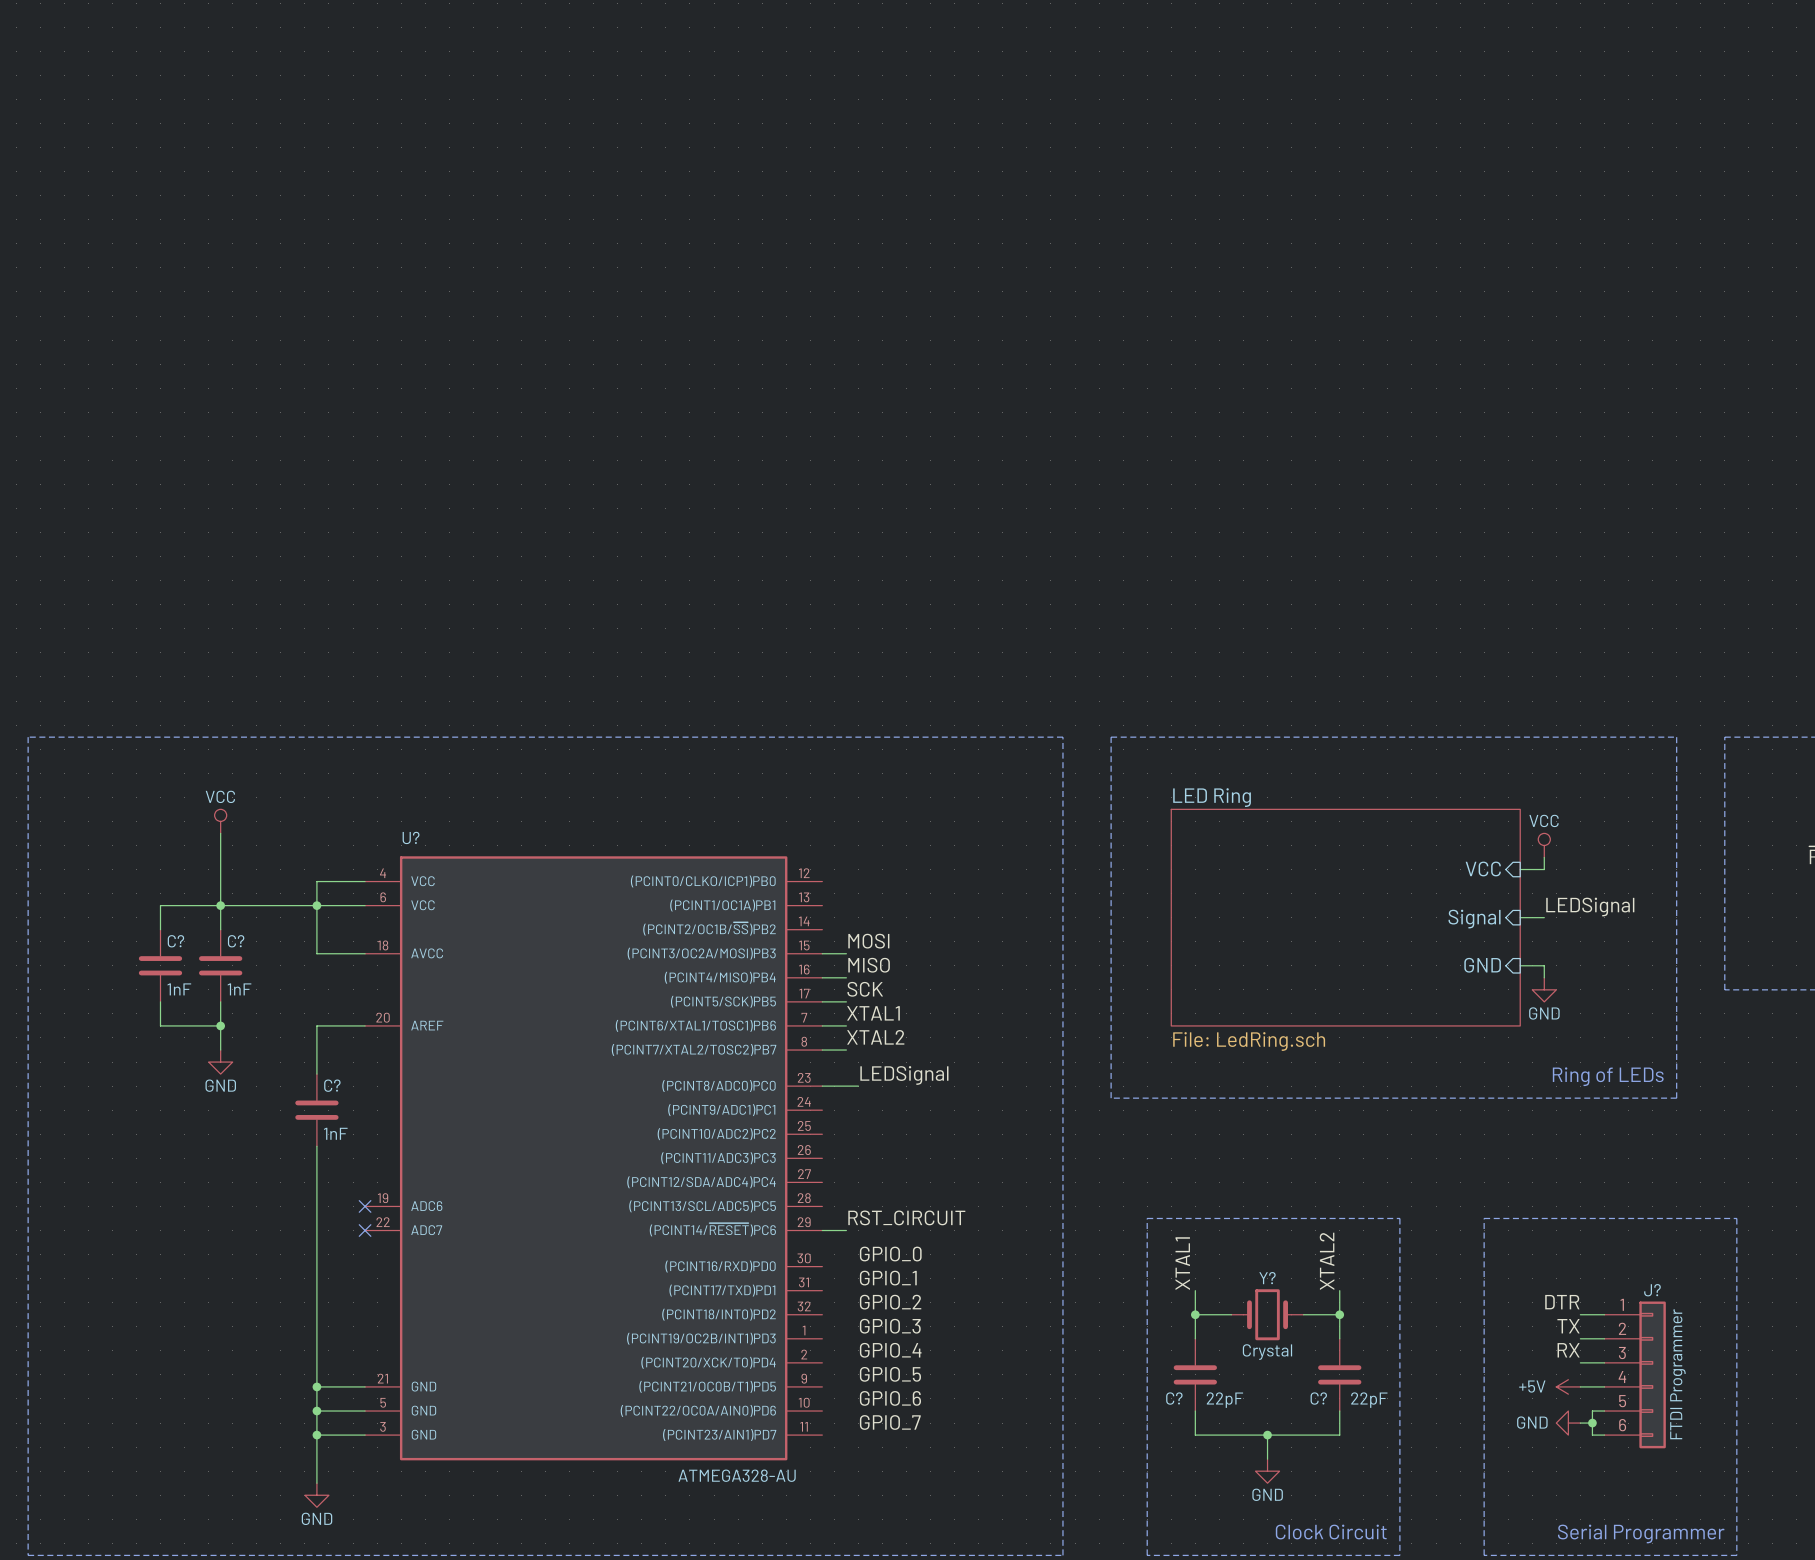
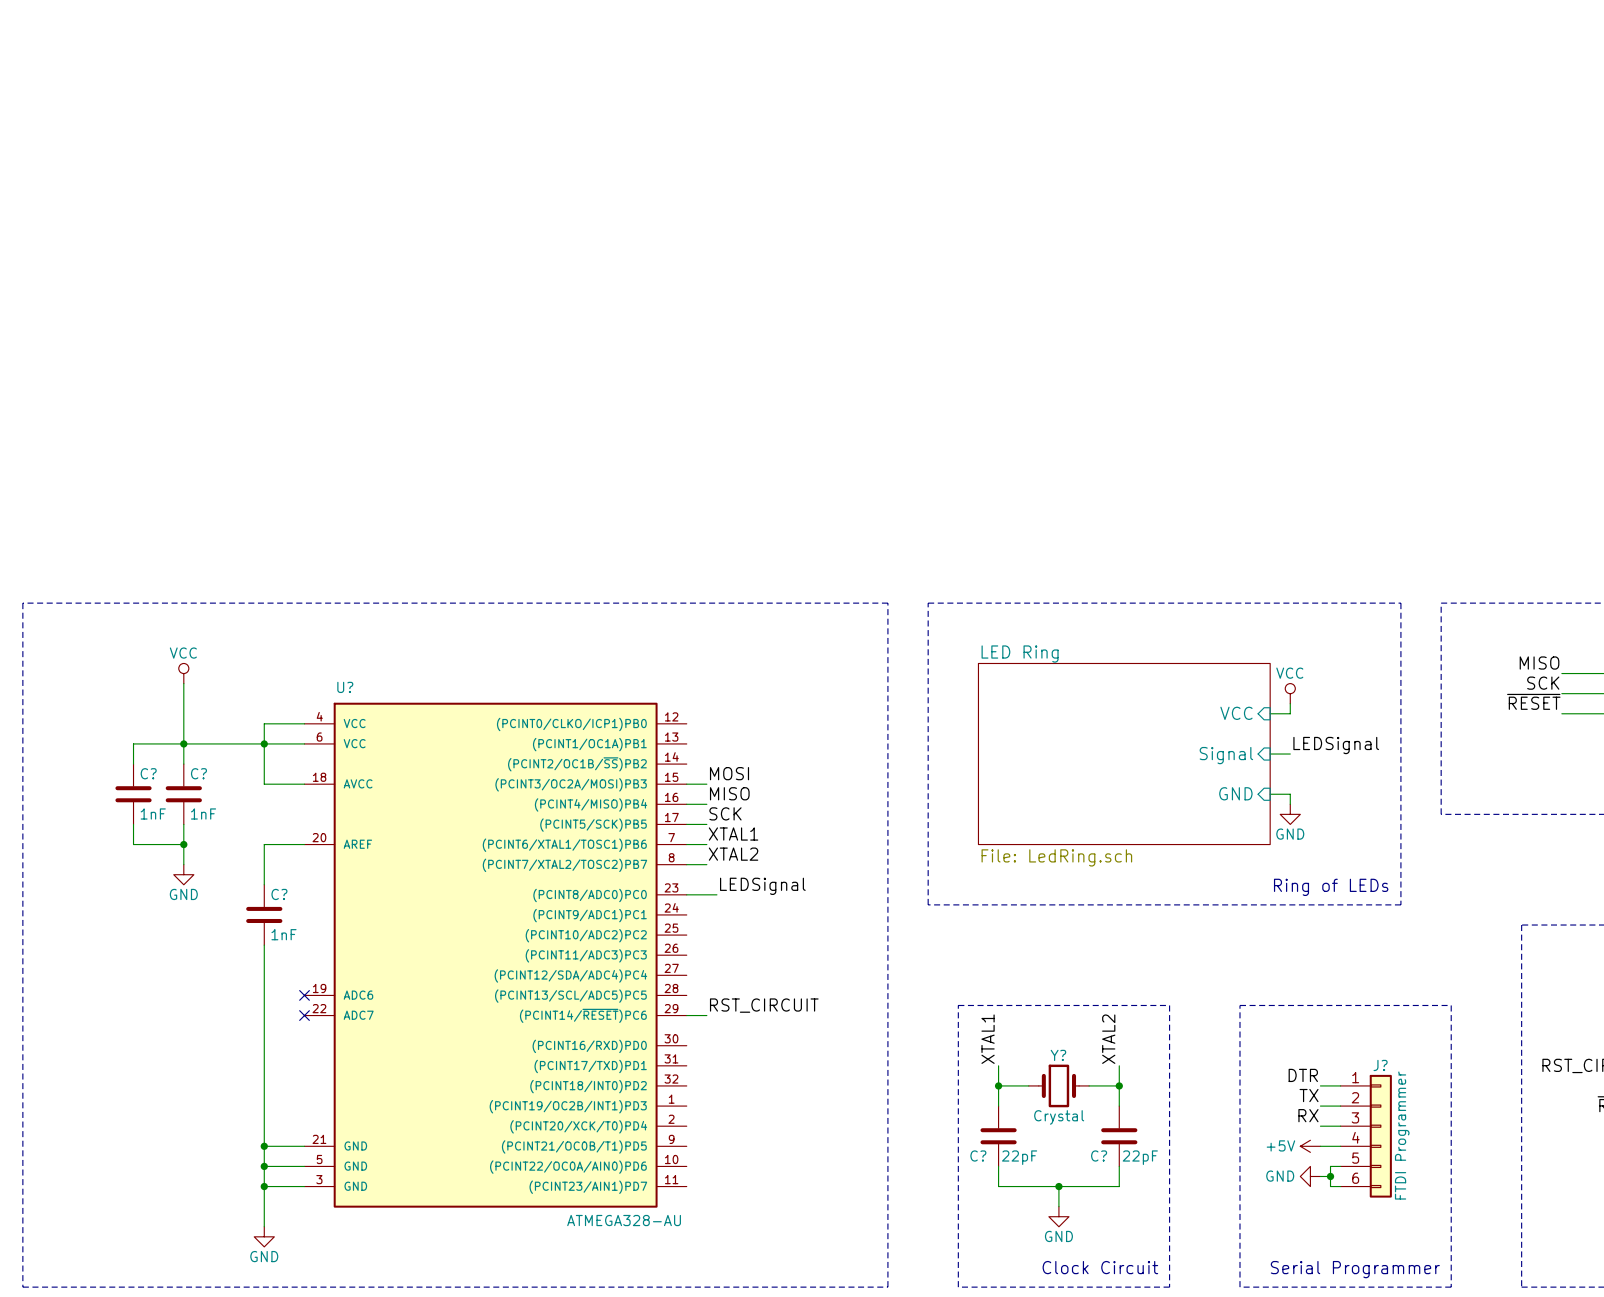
label: GPIO_0 (890, 1254) -> none
label: GPIO_1 (888, 1278) -> none
label: GPIO_2 (890, 1302) -> none
label: GPIO_3 (890, 1326) -> none
label: GPIO_4 (890, 1350) -> none
label: GPIO_5 (890, 1374) -> none
label: GPIO_6 (890, 1398) -> none
label: GPIO_7 (890, 1422) -> none

